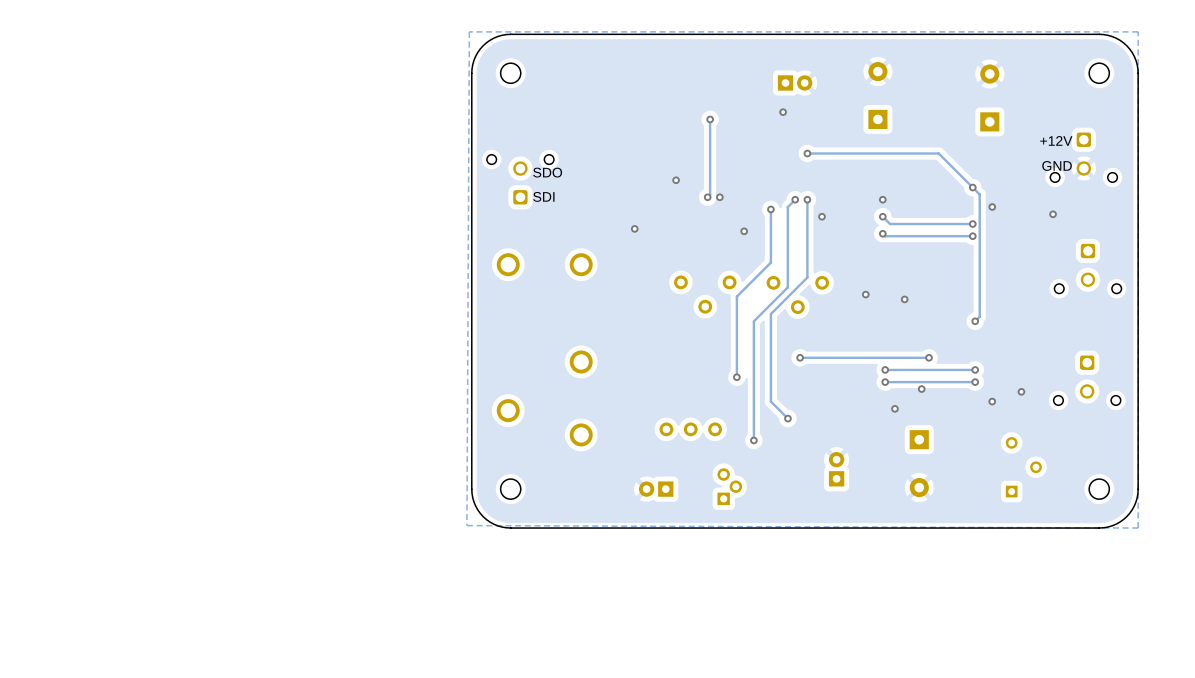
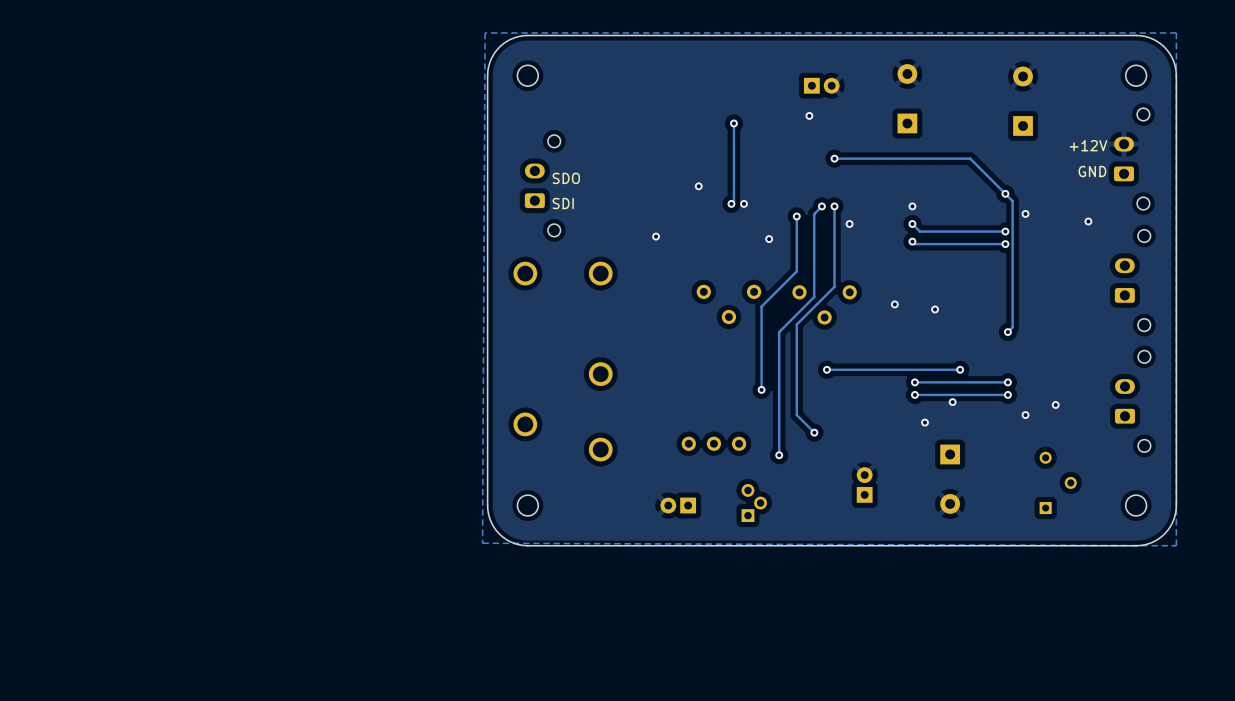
part: none -> (1131, 159)
part footprint: [486, 154, 554, 205] -> [524, 135, 561, 237]
part: (1083, 157) -> none
part footprint: [1054, 243, 1122, 294] -> [1114, 229, 1151, 332]
part: (1087, 380) -> none
part: none -> (1132, 401)

